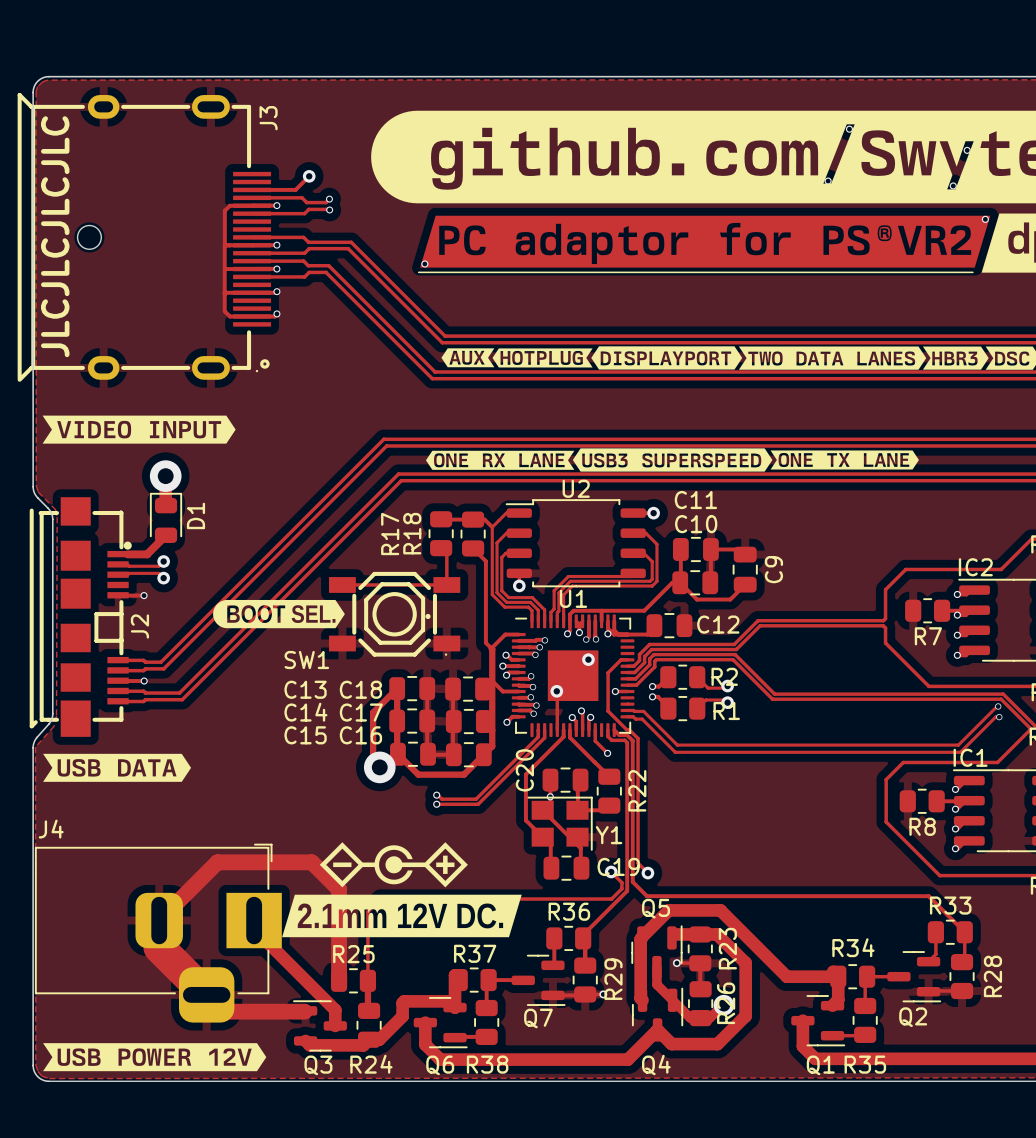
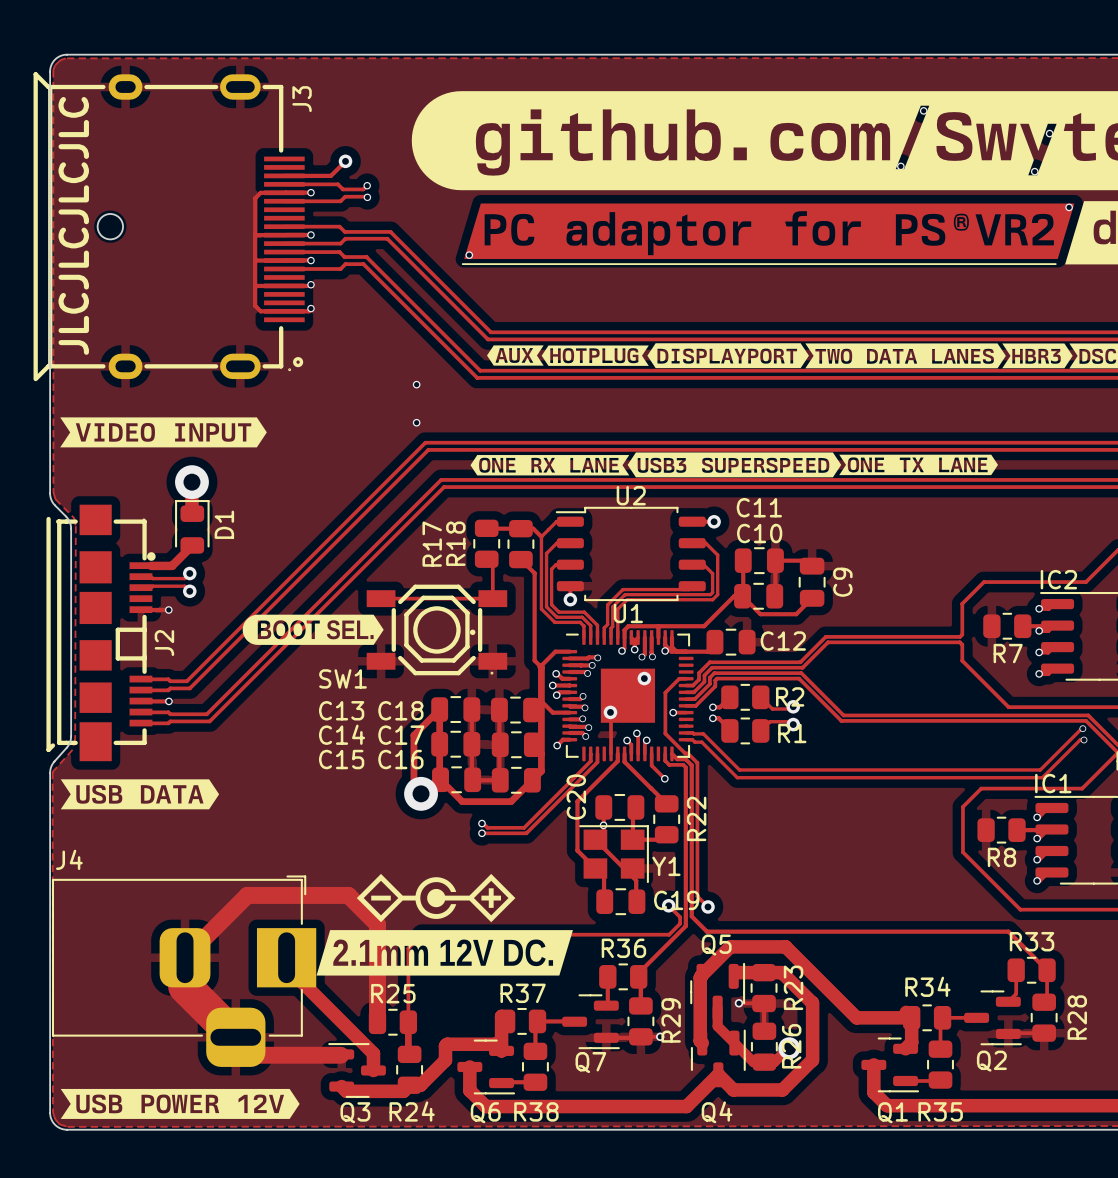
via: none -> (416, 384)
via: none -> (416, 422)

